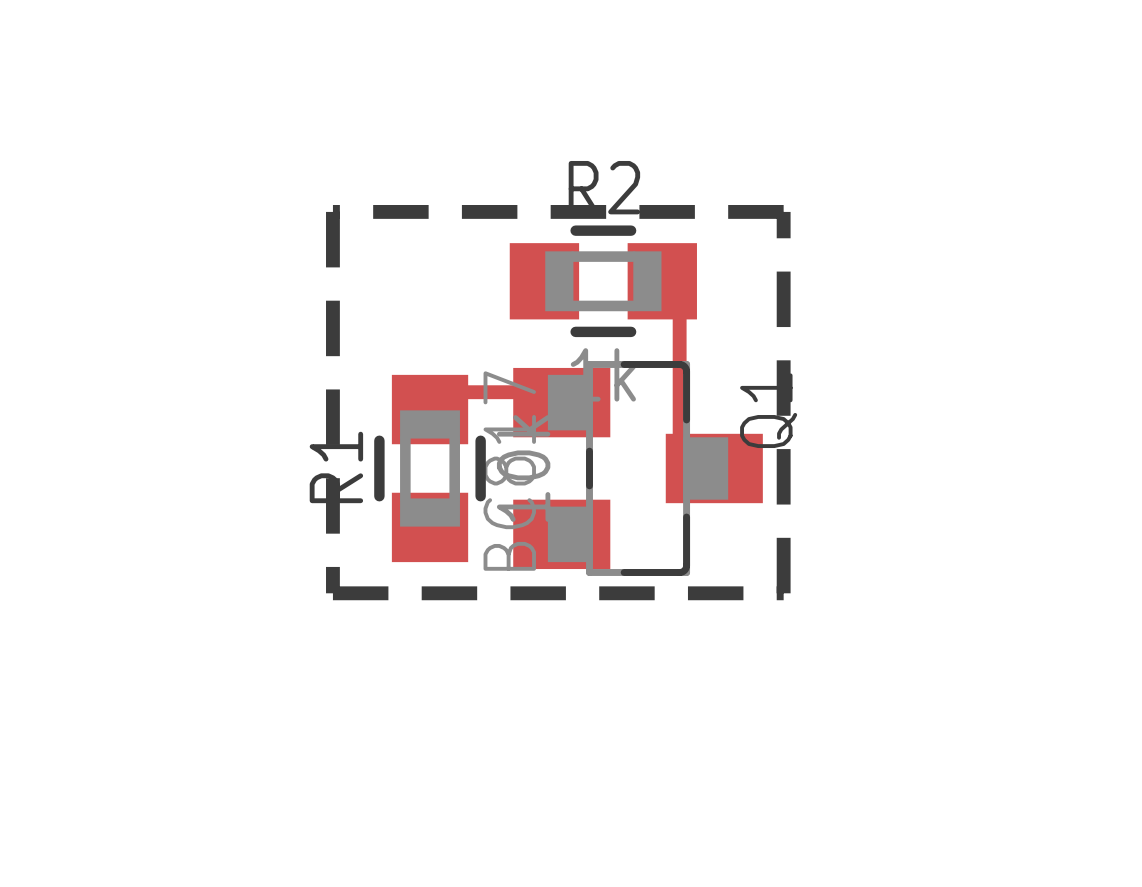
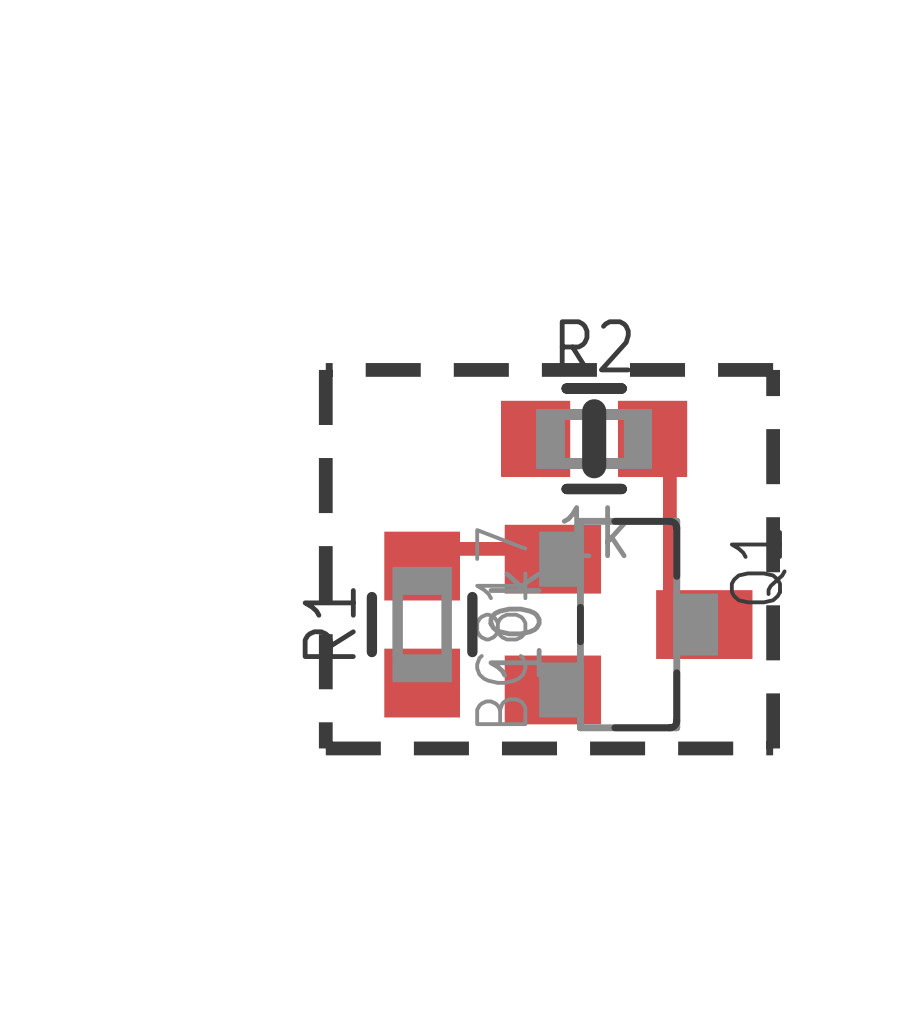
part: none -> (594, 438)

